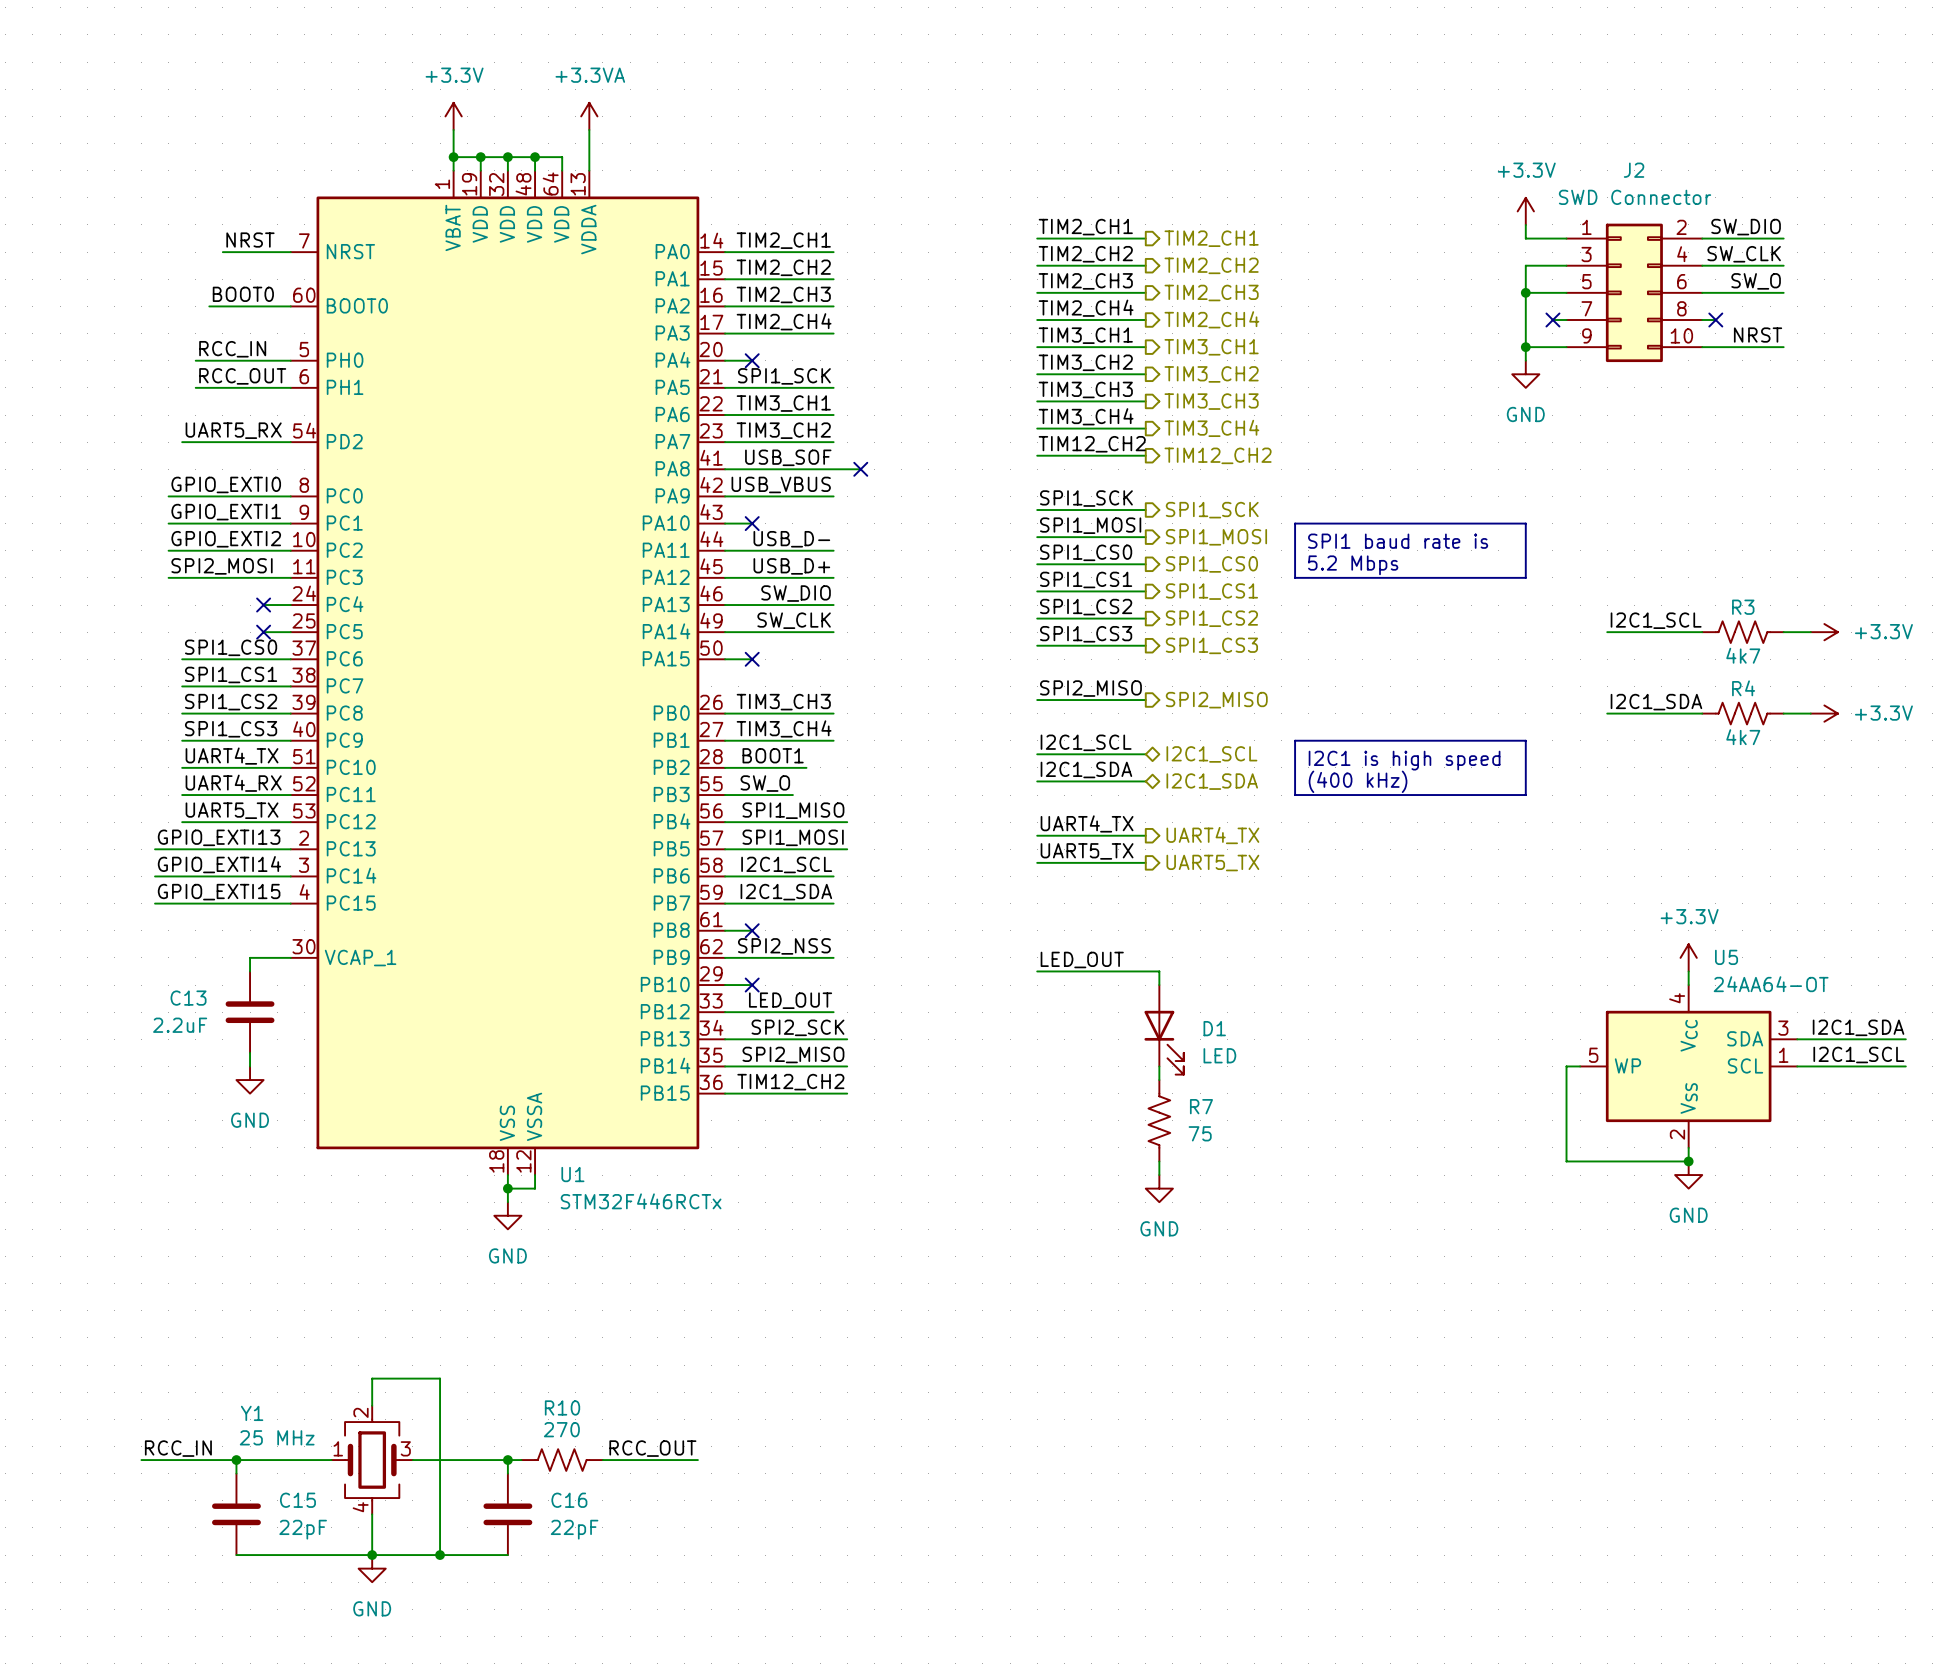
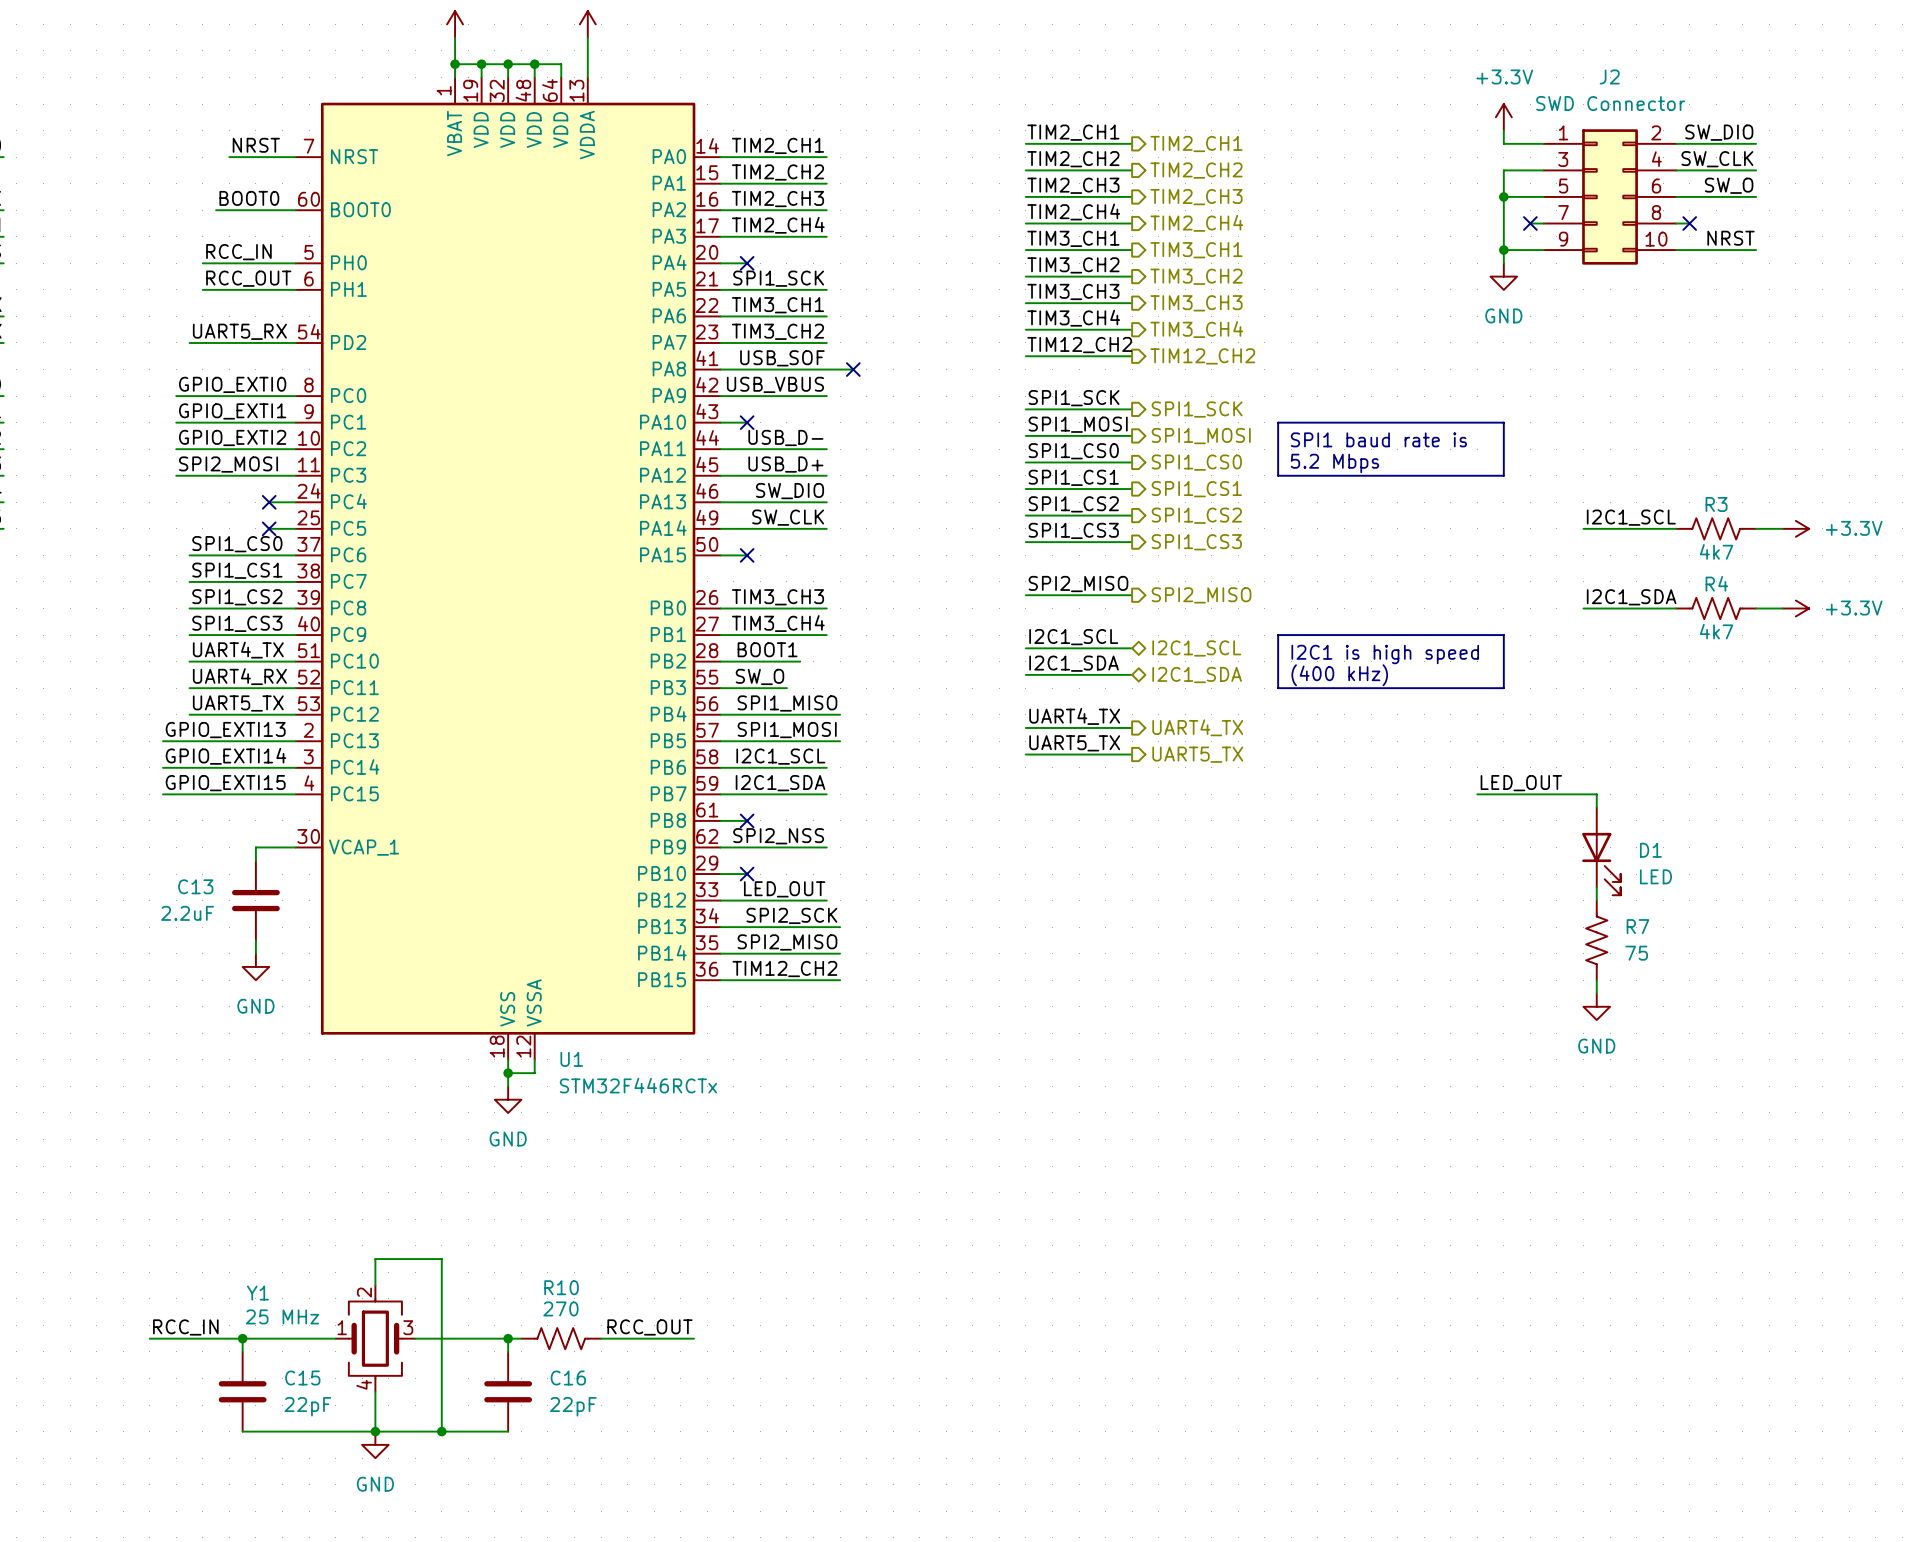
label: none -> LED_OUT (1521, 783)
wire: none -> (1477, 794) (1596, 794) (1596, 807)
power symbol: +3.3V (1688, 957) -> none
label: LED_OUT (1082, 959) -> none
wire: (1037, 971) (1159, 971) (1159, 985) -> none
wire: (1688, 971) (1688, 985) -> (1596, 887) (1596, 900)
label: I2C1_SDA (1858, 1027) -> none
D1 position: (1164, 1029) -> (1601, 851)
wire: (1797, 1039) (1905, 1039) -> none
label: I2C1_SCL (1858, 1054) -> none
wire: (1159, 1066) (1159, 1080) -> none
wire: (1580, 1066) (1566, 1066) (1566, 1161) (1688, 1161) (1688, 1147) -> none
U5: 24AA64-OT (1688, 1066) -> none
wire: (1797, 1066) (1905, 1066) -> none
R7 position: (1159, 1120) -> (1596, 940)
wire: (1159, 1161) (1159, 1175) -> none
junction: (1688, 1161) -> none
power symbol position: GND (1688, 1175) -> GND (1596, 1006)
power symbol: GND (1159, 1188) -> none

